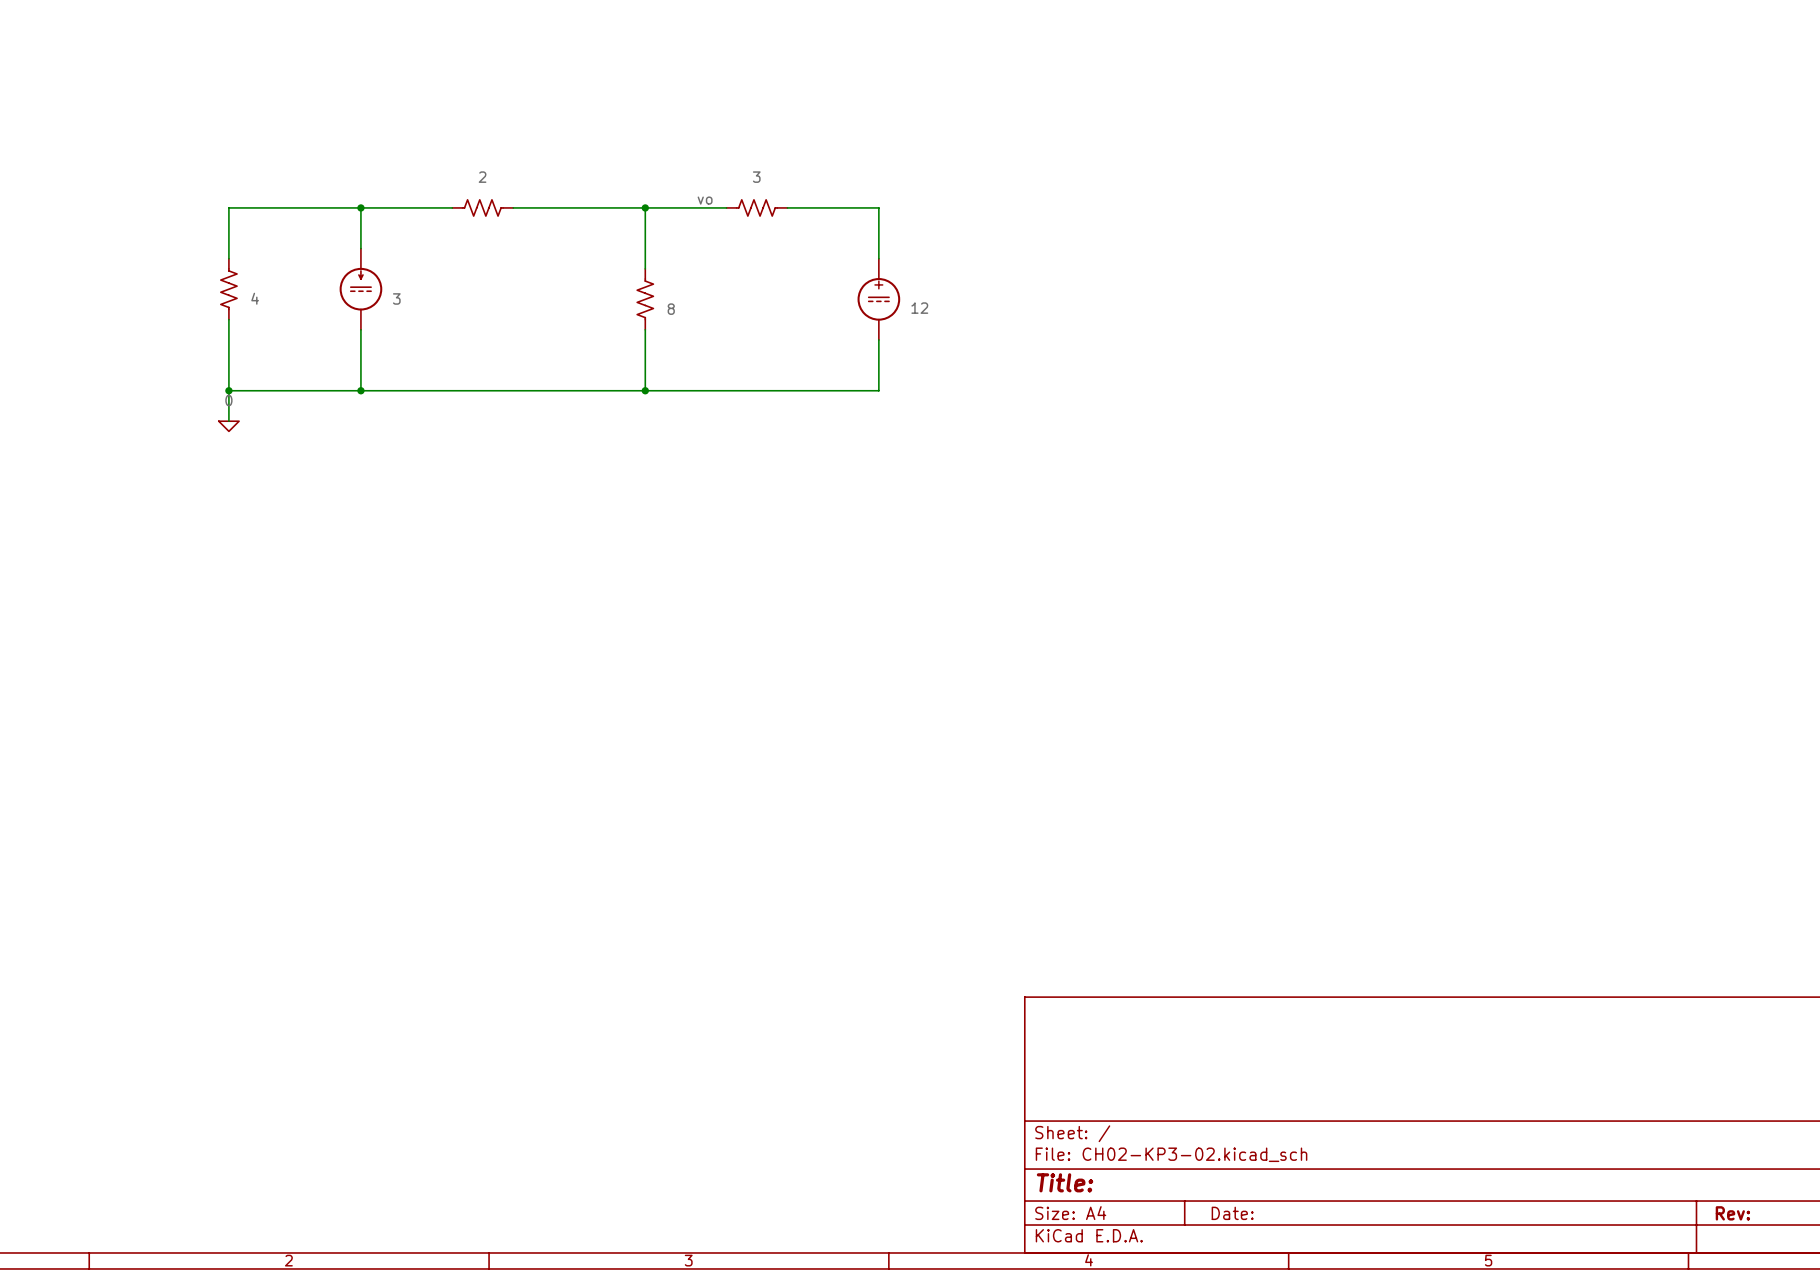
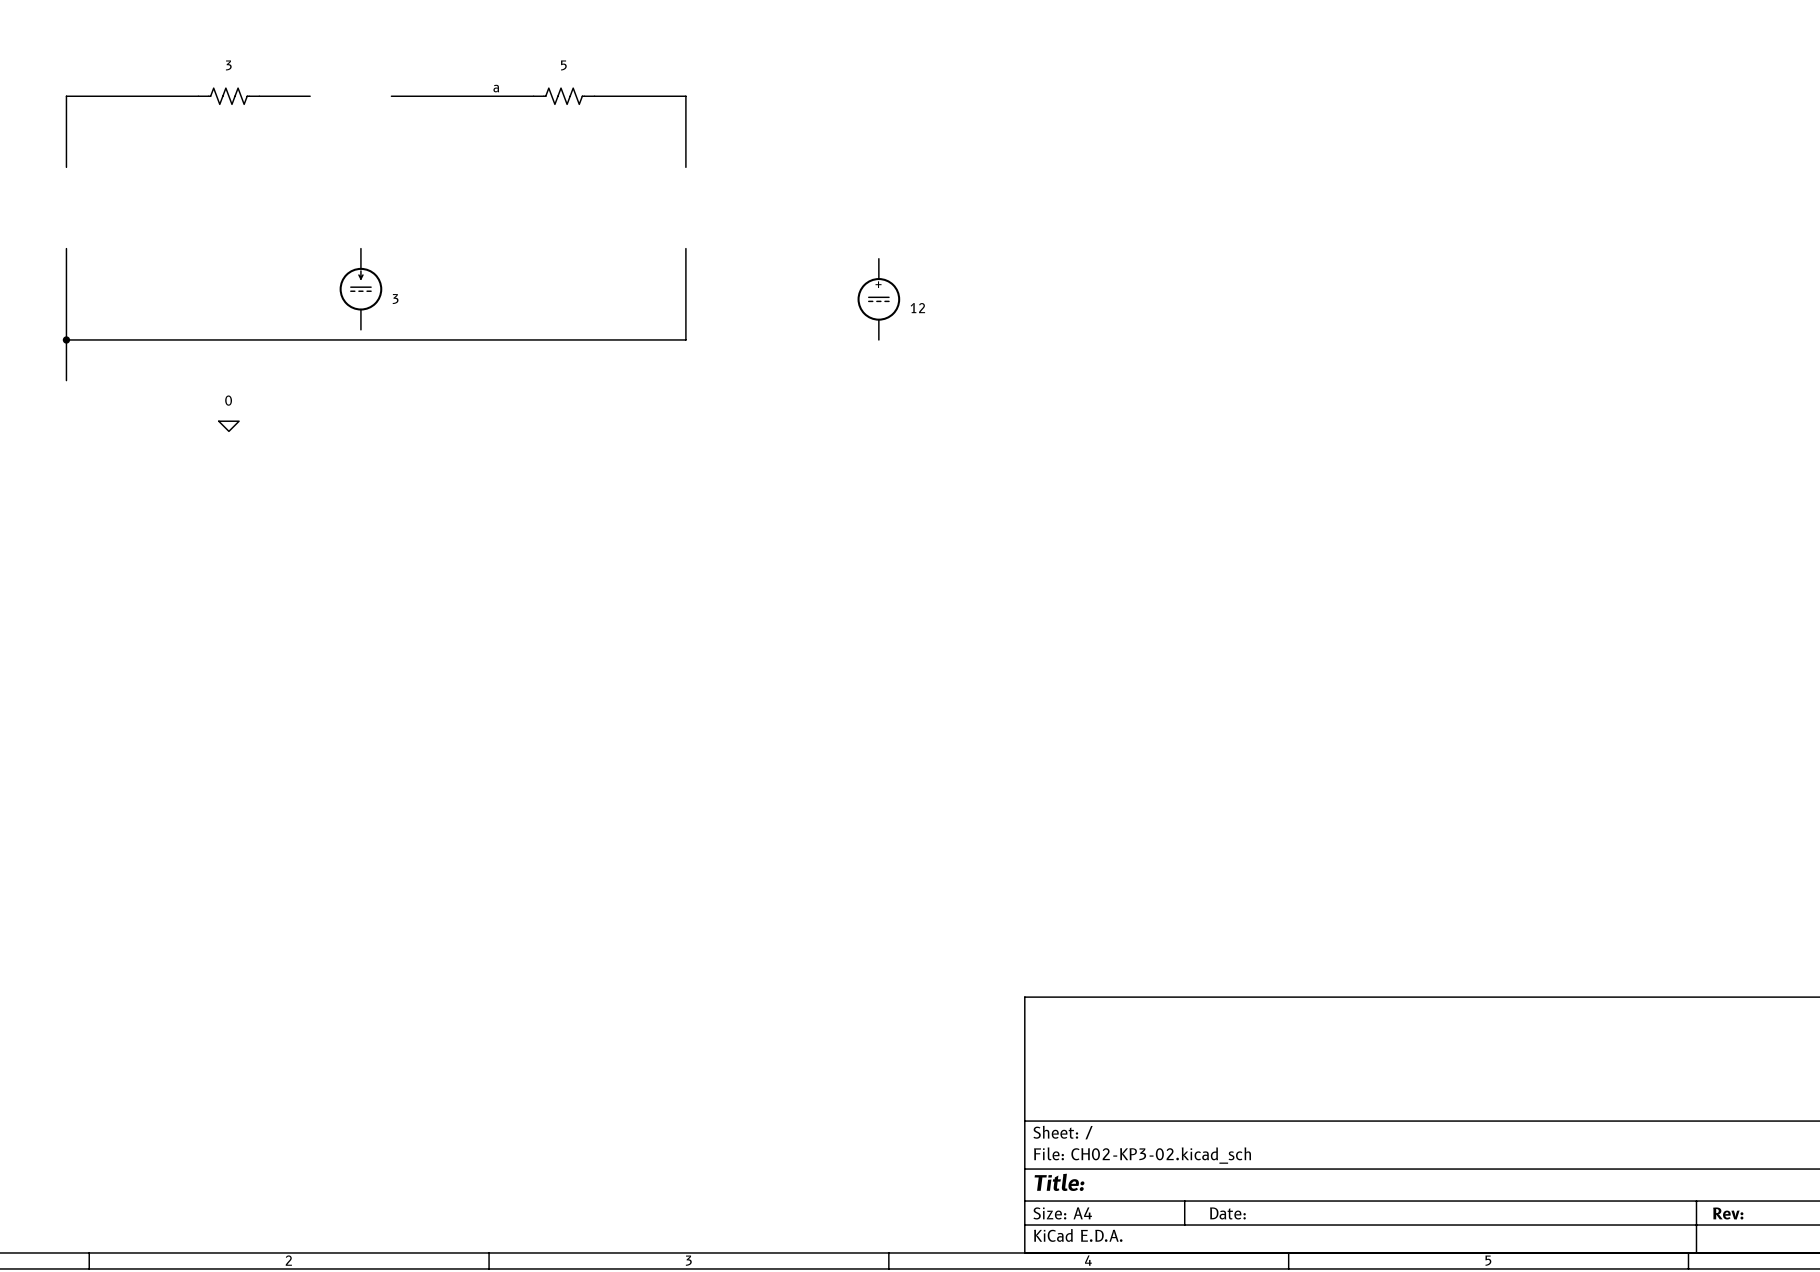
label: none -> a (496, 88)
wire: none -> (198, 96) (66, 96) (66, 167)
part: none -> 3 (228, 96)
wire: none -> (259, 96) (310, 96)
wire: none -> (391, 96) (533, 96)
part: none -> 5 (564, 96)
wire: none -> (594, 96) (685, 96) (685, 167)
label: vo (705, 200) -> none
wire: (360, 207) (360, 248) -> none
junction: (360, 207) -> none
wire: (452, 207) (228, 207) (228, 258) -> none
part: 2 (482, 207) -> none
wire: (513, 207) (726, 207) -> none
wire: (645, 207) (645, 268) -> none
junction: (645, 207) -> none
part: 3 (757, 207) -> none
wire: (787, 207) (878, 207) (878, 258) -> none
wire: none -> (66, 248) (66, 380)
wire: none -> (685, 248) (685, 339) (66, 339)
part: 4 (228, 289) -> none
part: 8 (645, 299) -> none
wire: (228, 319) (228, 421) -> none
wire: (360, 329) (360, 390) -> none
wire: (645, 329) (645, 390) -> none
junction: none -> (66, 339)
wire: (878, 339) (878, 390) (228, 390) -> none
junction: (228, 390) -> none
junction: (360, 390) -> none
junction: (645, 390) -> none

